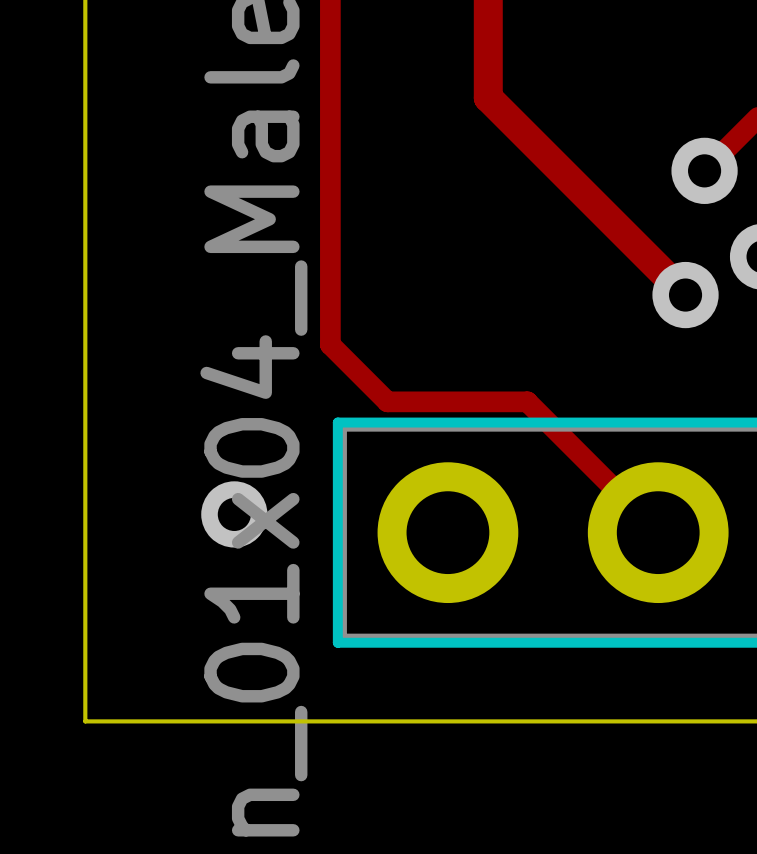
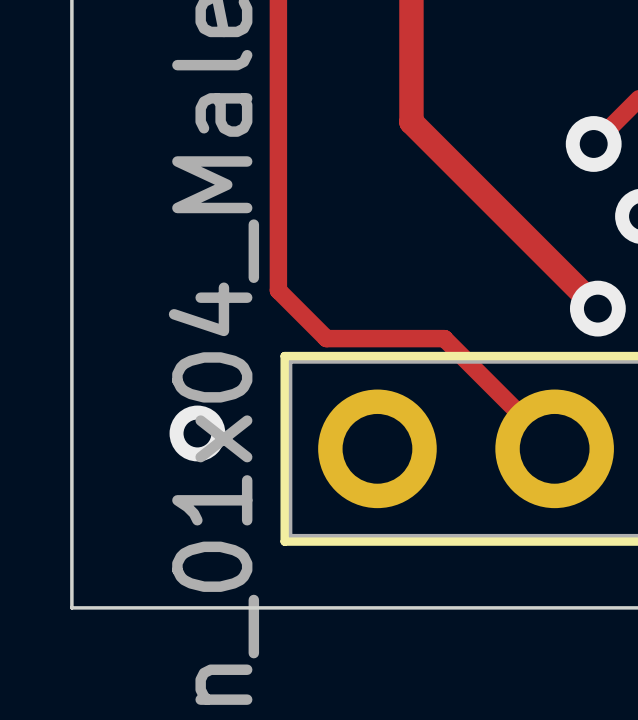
track: (488, 97) (685, 295) -> (411, 82) (411, 122) (597, 308)
via position: (685, 295) -> (597, 308)

